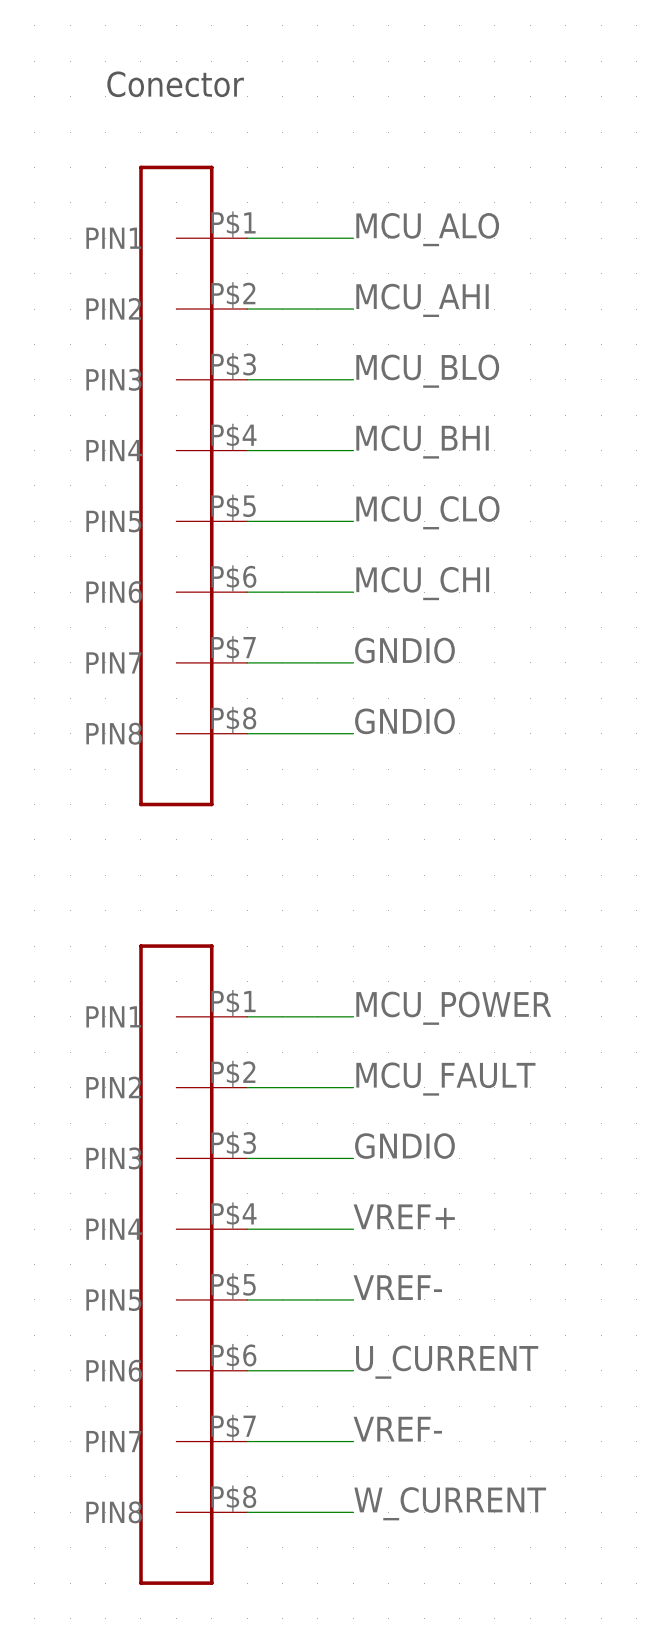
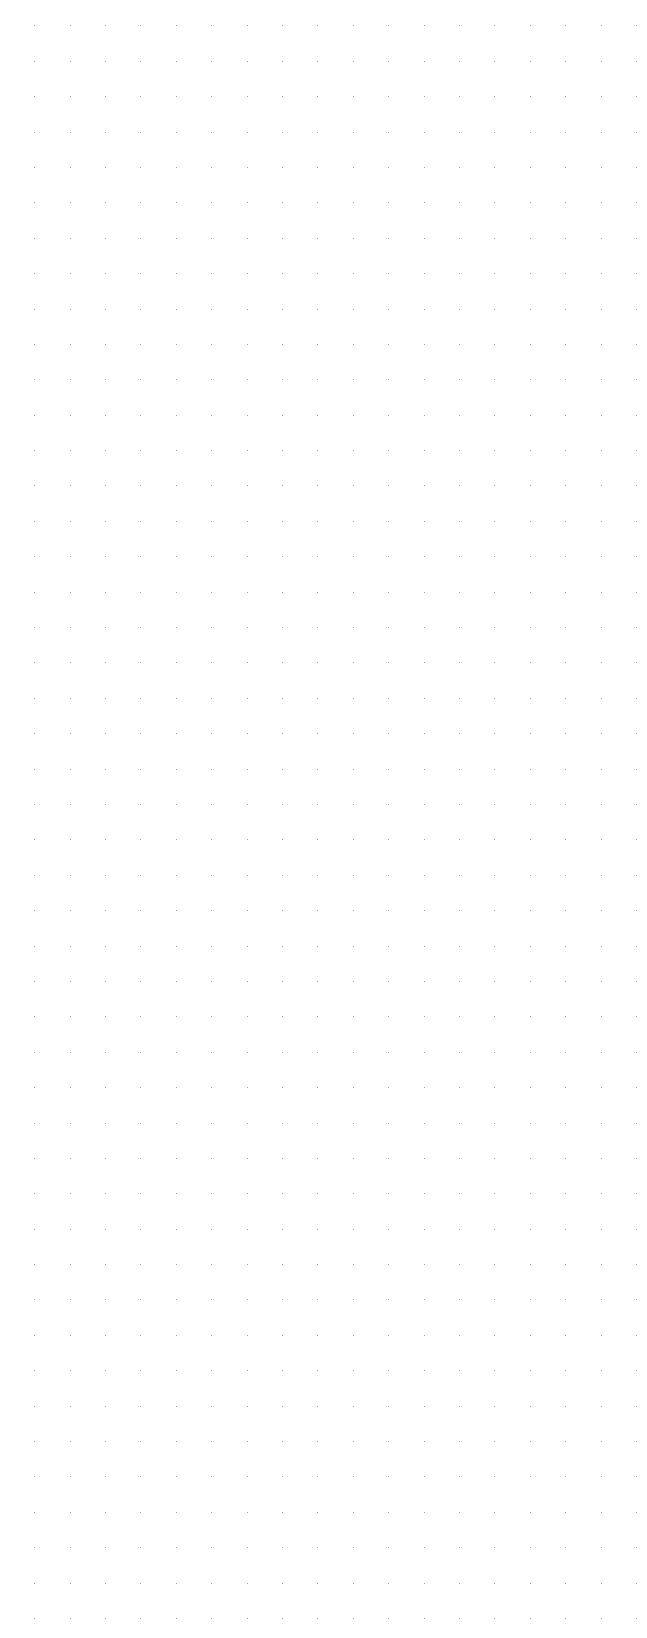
text: Conector (175, 84) -> none
label: MCU_ALO (427, 229) -> none
wire: (247, 238) (353, 238) -> none
label: MCU_AHI (422, 300) -> none
wire: (247, 309) (353, 309) -> none
label: MCU_BLO (427, 371) -> none
wire: (247, 379) (353, 379) -> none
label: MCU_BHI (422, 441) -> none
wire: (247, 450) (353, 450) -> none
part: (193, 485) -> none
label: MCU_CLO (427, 512) -> none
wire: (247, 521) (353, 521) -> none
label: MCU_CHI (422, 583) -> none
wire: (247, 592) (353, 592) -> none
label: GNDIO (404, 650) -> none
wire: (247, 662) (353, 662) -> none
label: GNDIO (404, 721) -> none
wire: (247, 733) (353, 733) -> none
label: MCU_POWER (453, 1008) -> none
wire: (247, 1016) (353, 1016) -> none
label: MCU_FAULT (445, 1079) -> none
wire: (247, 1087) (353, 1087) -> none
label: GNDIO (404, 1146) -> none
wire: (247, 1158) (353, 1158) -> none
label: VREF+ (404, 1216) -> none
wire: (247, 1229) (353, 1229) -> none
part: (193, 1264) -> none
label: VREF- (397, 1287) -> none
wire: (247, 1299) (353, 1299) -> none
label: U_CURRENT (447, 1362) -> none
wire: (247, 1370) (353, 1370) -> none
label: VREF- (397, 1429) -> none
wire: (247, 1441) (353, 1441) -> none
label: W_CURRENT (450, 1503) -> none
wire: (247, 1512) (353, 1512) -> none

